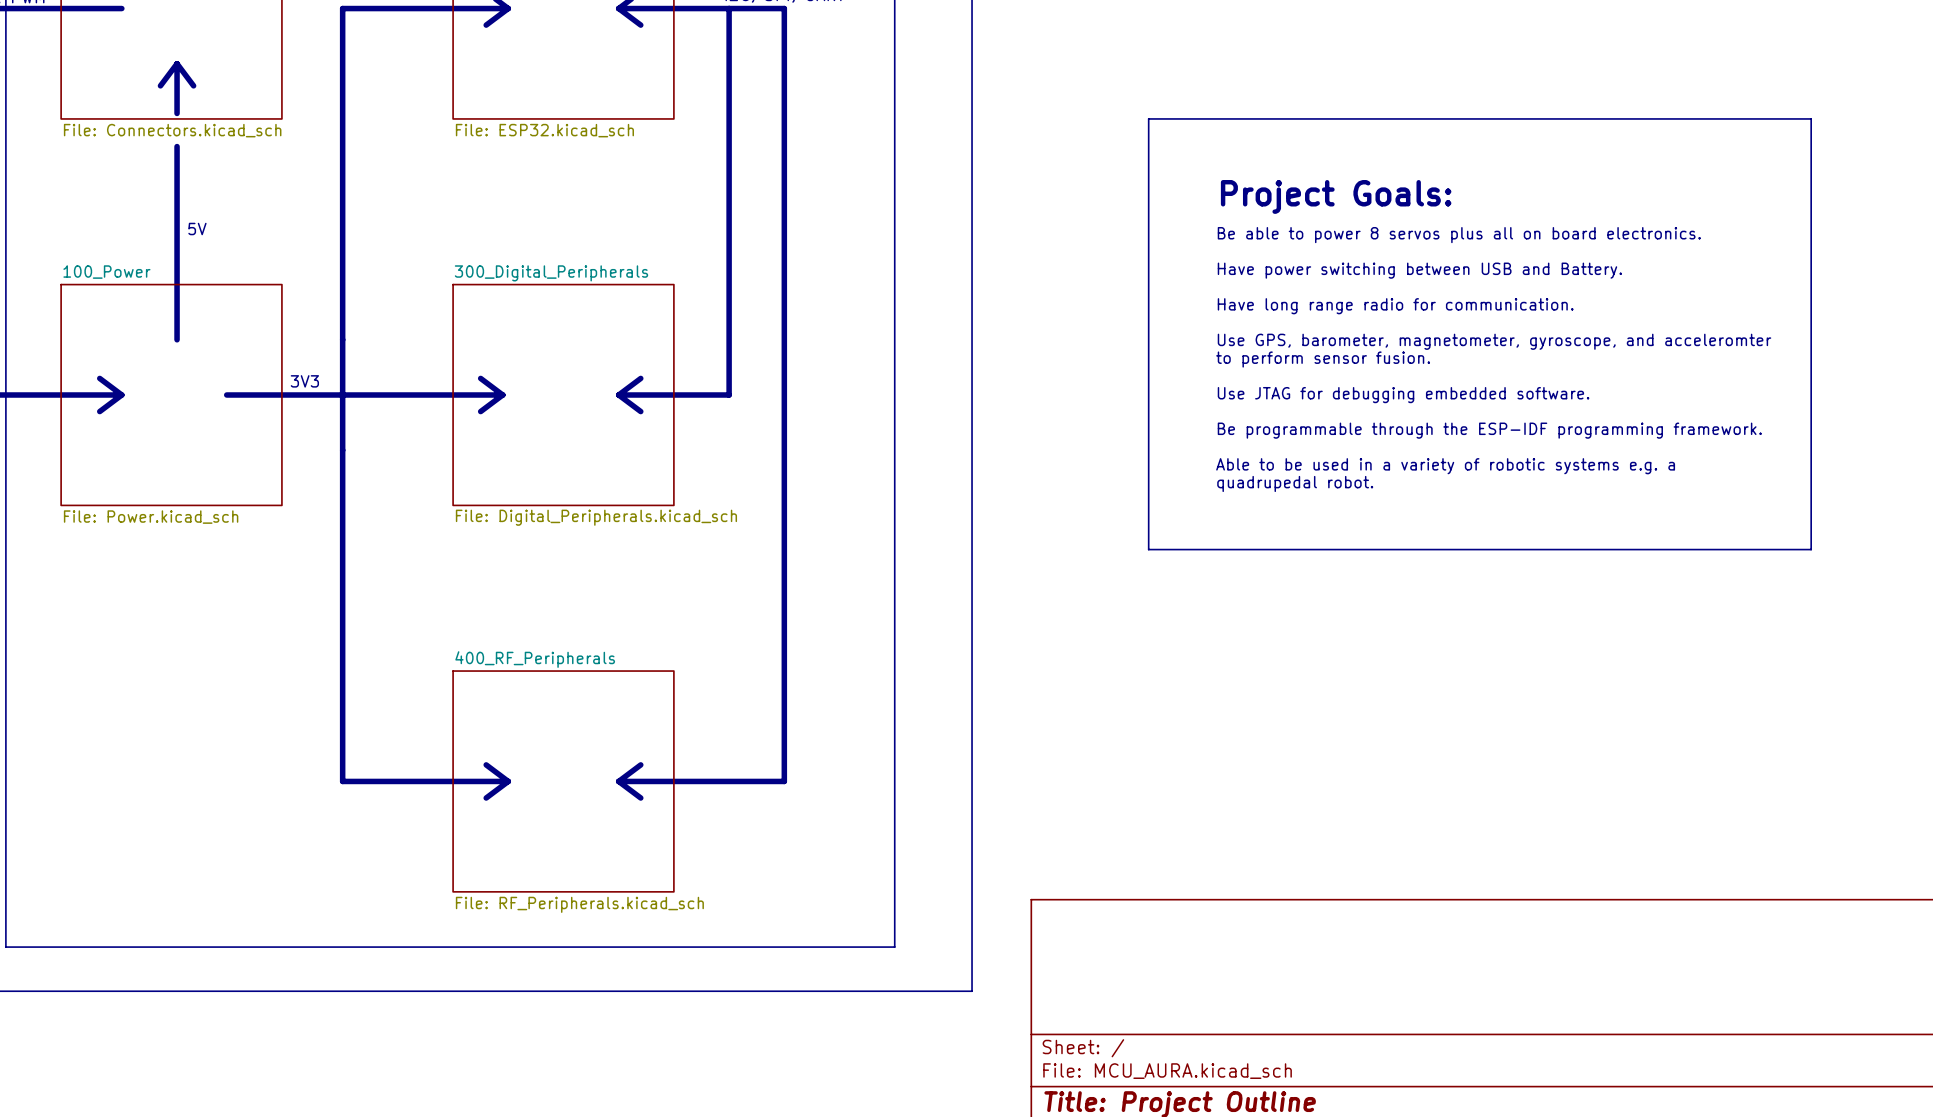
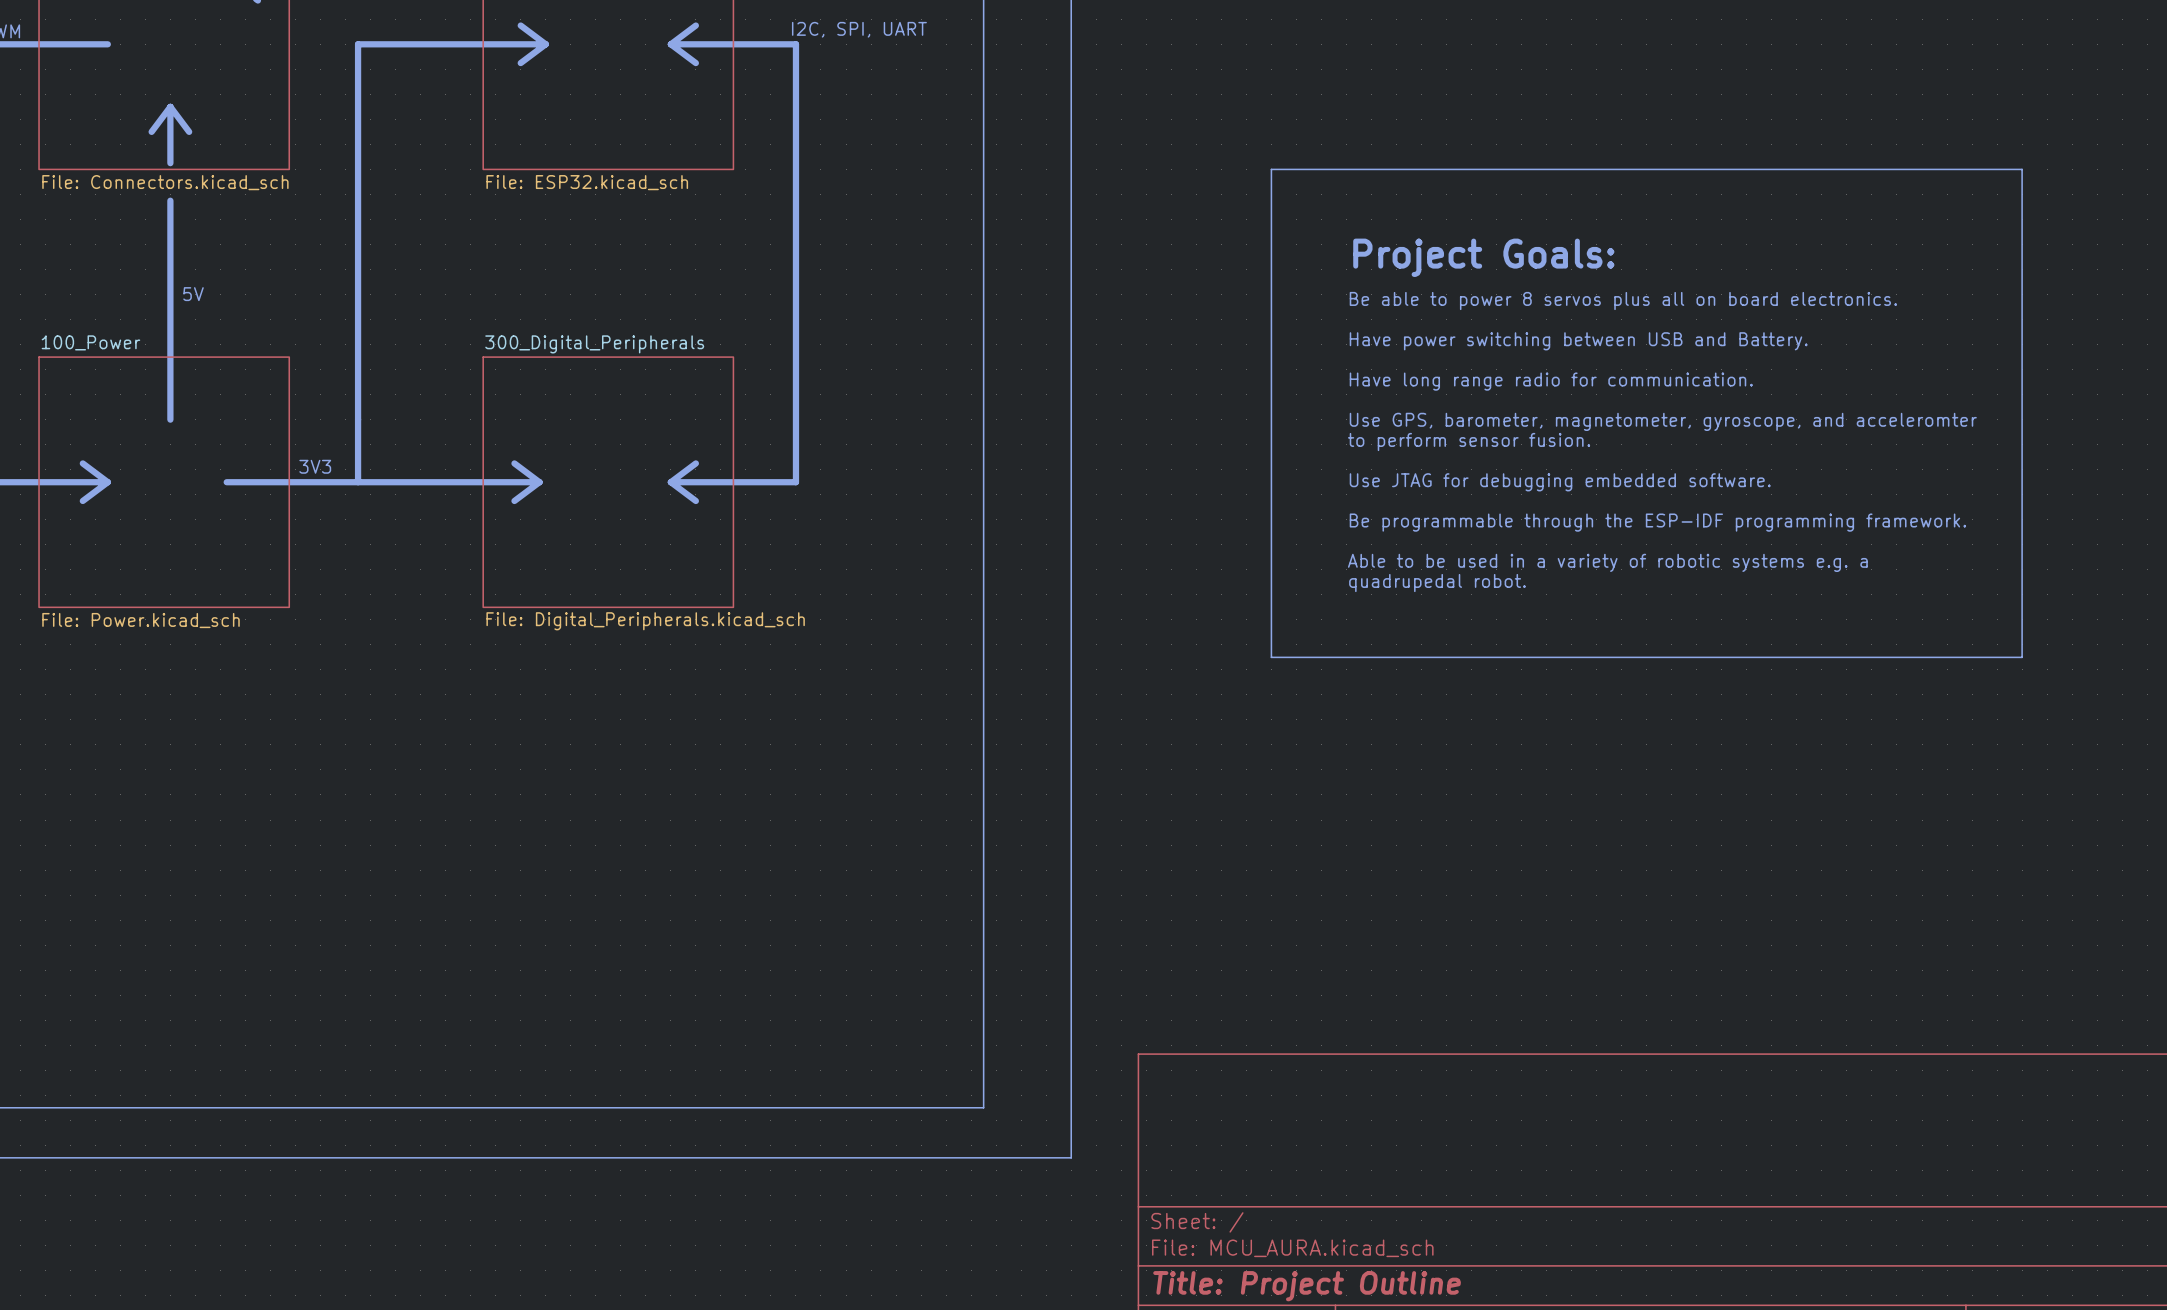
line: (729, 8) (784, 8) (784, 781) (618, 781) -> none
line: (342, 395) (342, 781) (508, 781) -> none
line: (486, 764) (508, 781) -> none
line: (640, 764) (618, 781) -> none
line: (508, 781) (486, 798) -> none
sheet 400_RF_Peripherals: File: RF_Peripherals.kicad_sch (563, 781) -> none
line: (618, 781) (640, 798) -> none

